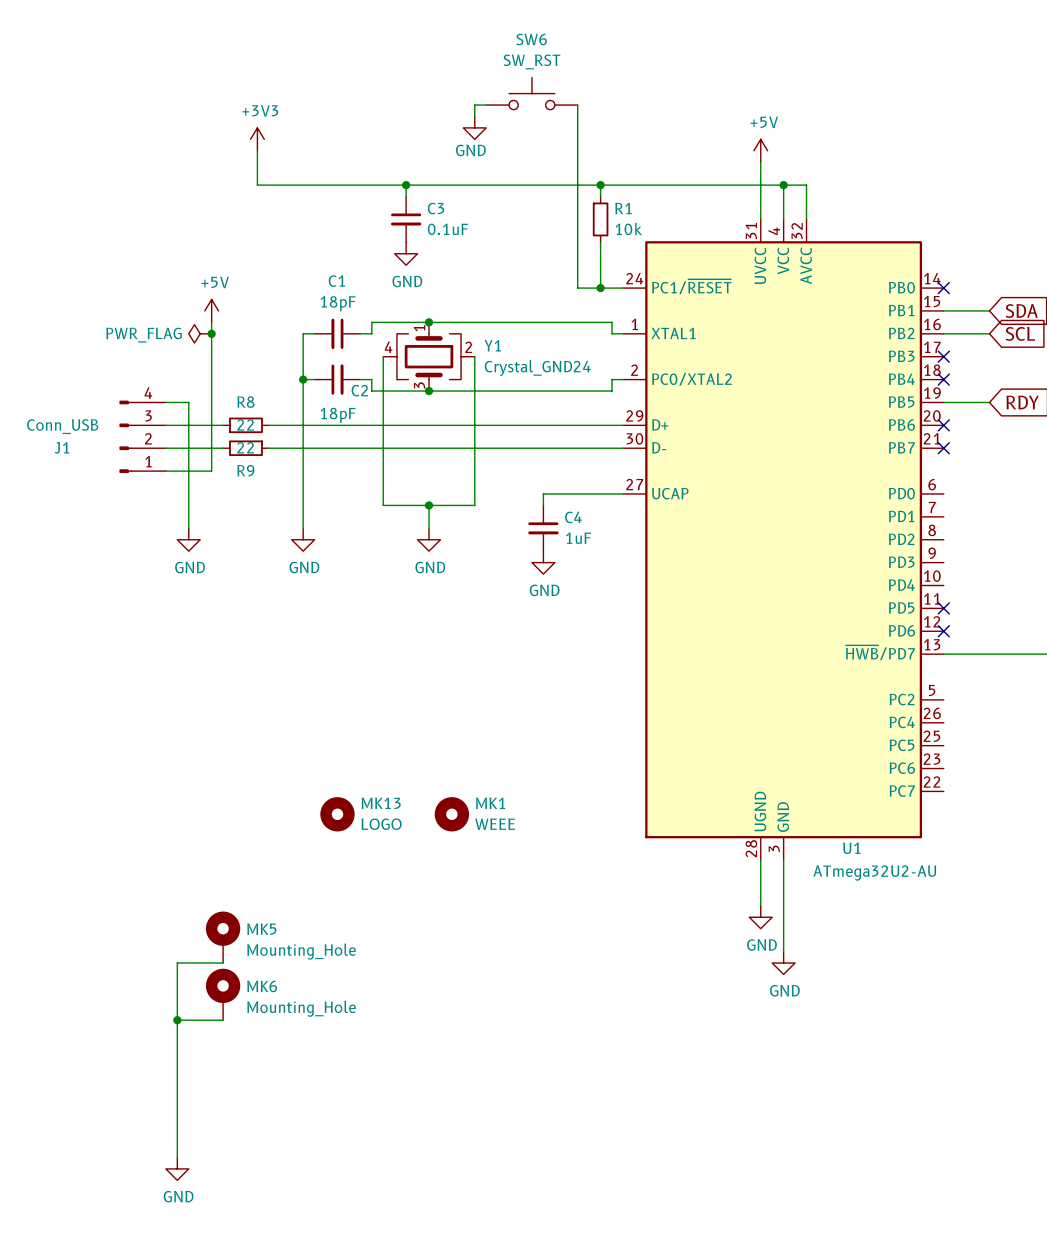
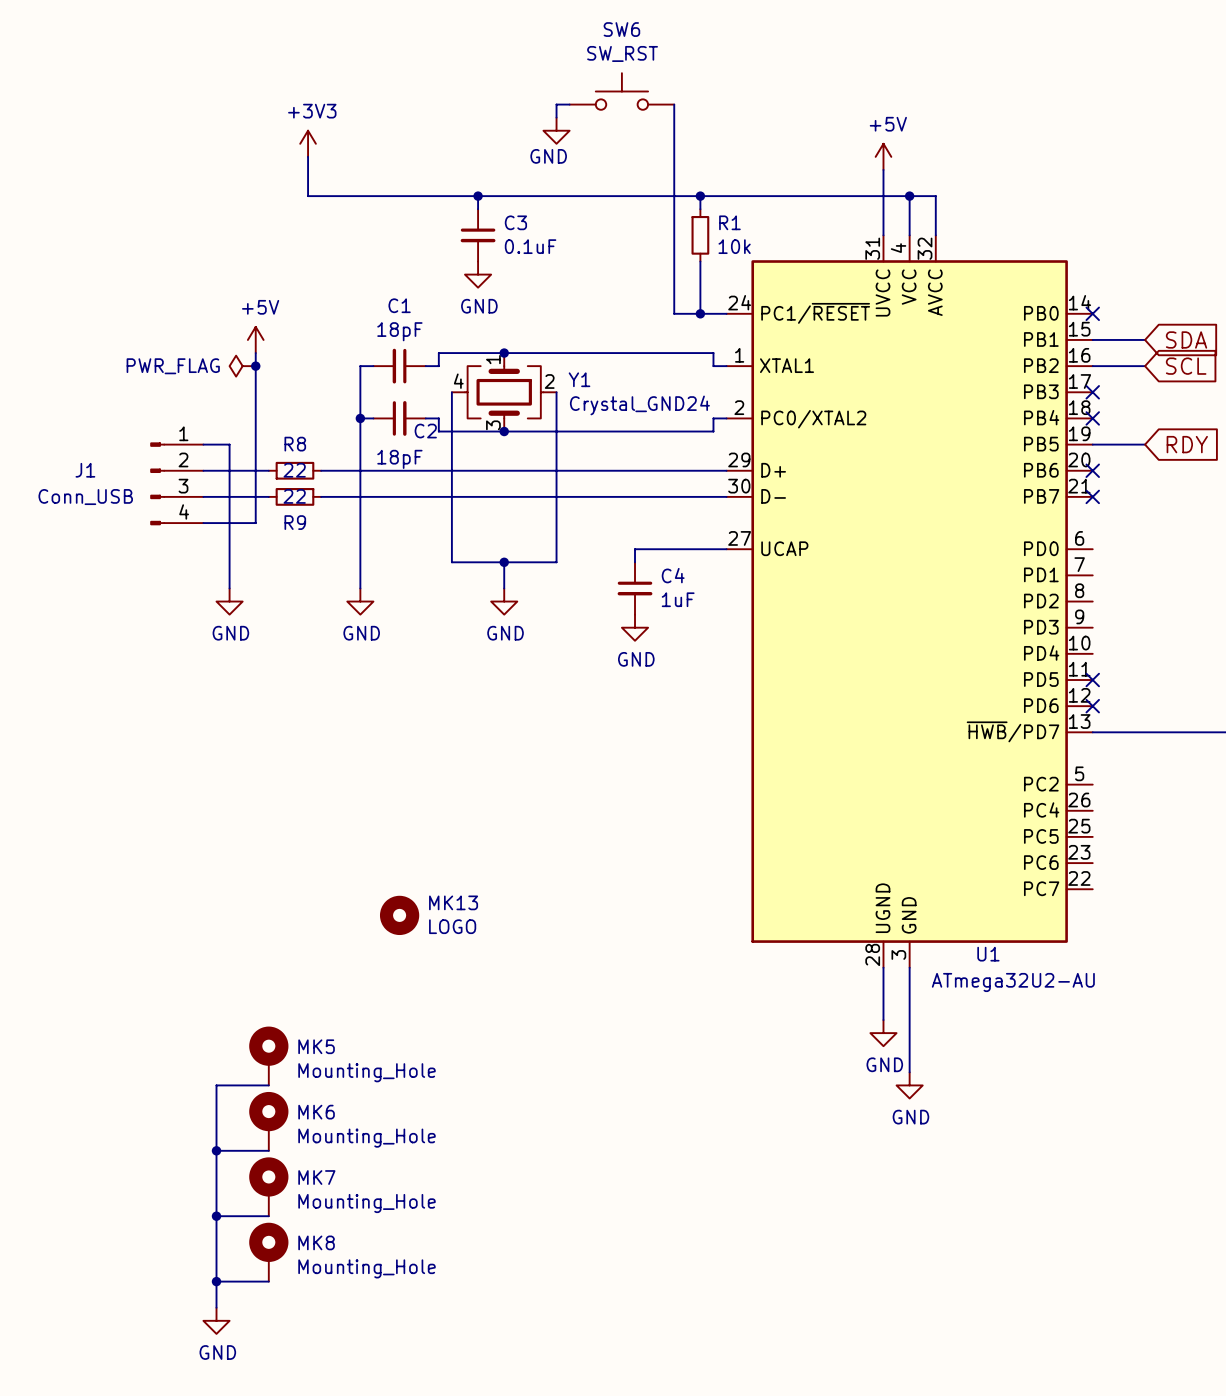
J1 flip: as is (125, 436) -> up-down (157, 483)
MK1: WEEE (451, 814) -> none
MK7: none -> Mounting_Hole (268, 1186)
wire: none -> (216, 1216) (268, 1216)
junction: none -> (216, 1216)
MK8: none -> Mounting_Hole (268, 1252)
wire: none -> (216, 1281) (268, 1281)
junction: none -> (216, 1281)

